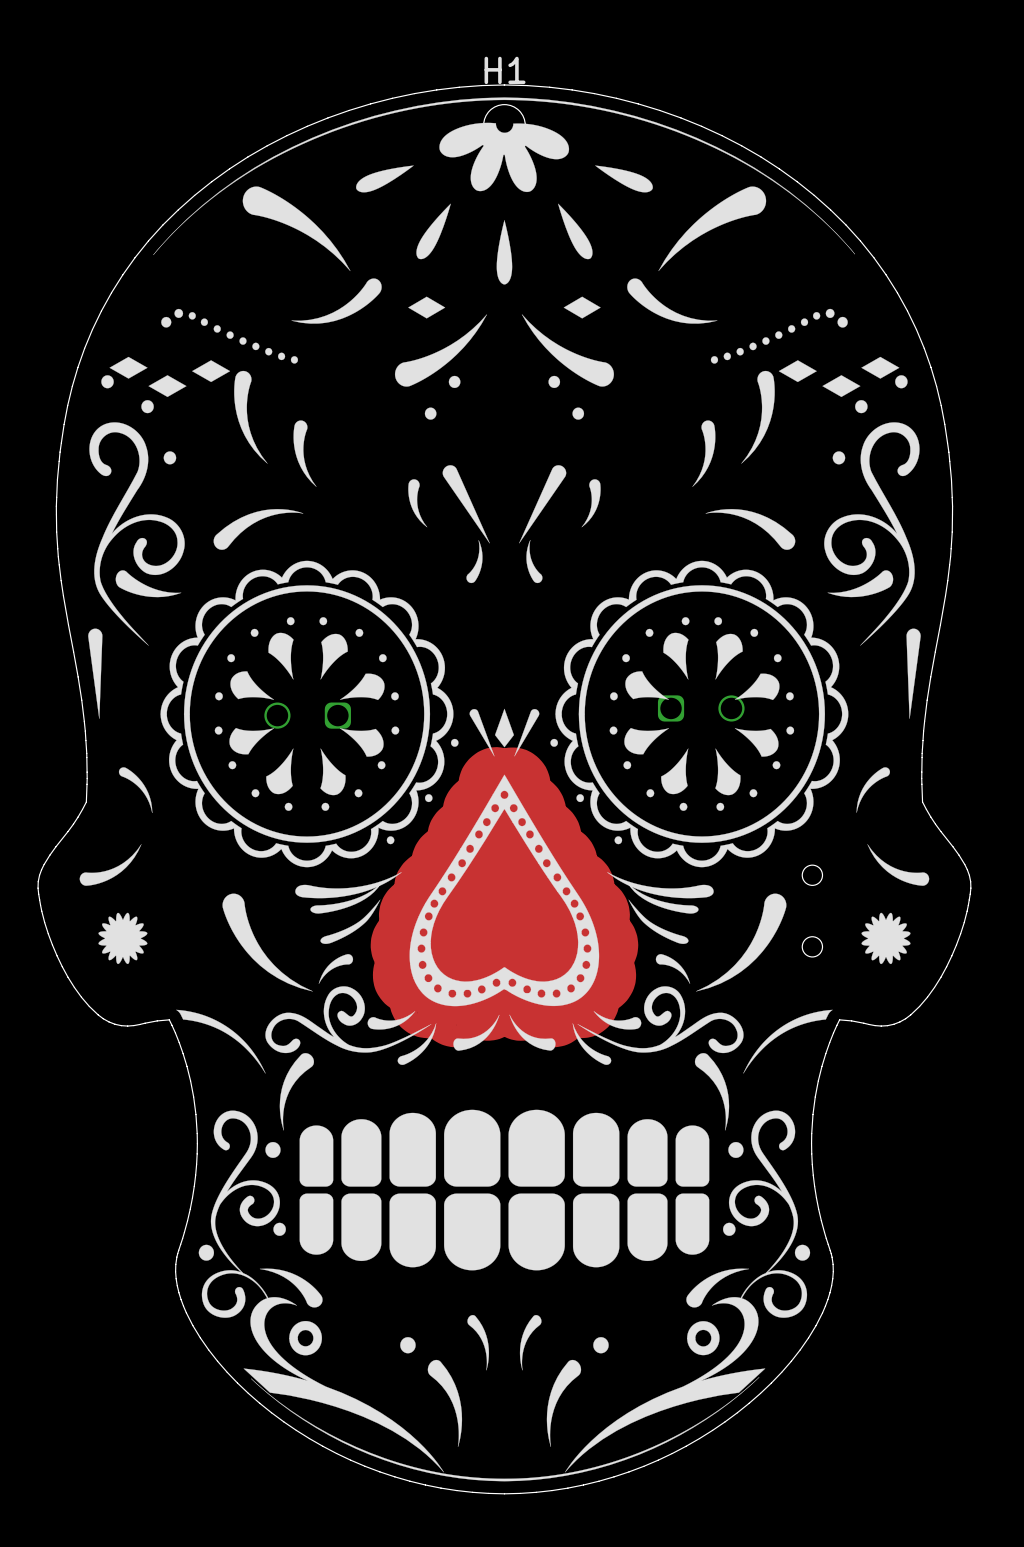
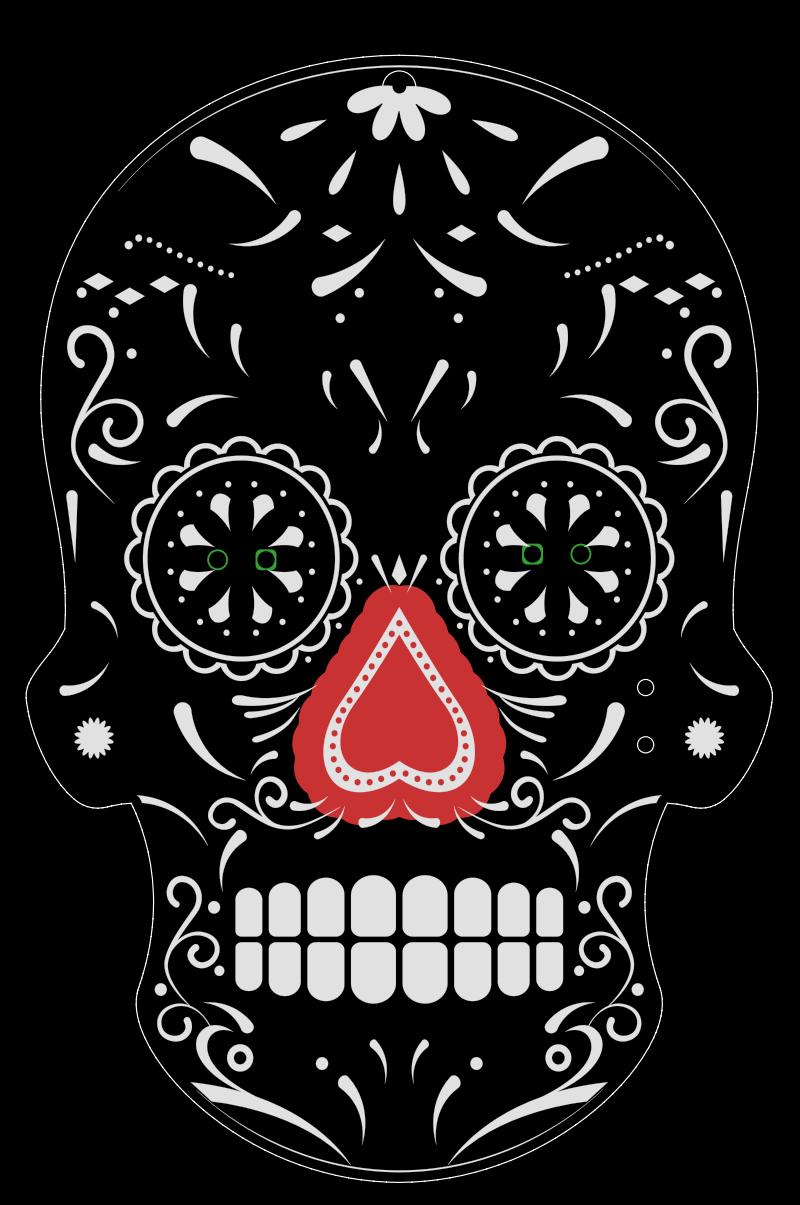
H1 name: H1 (505, 70) -> none

